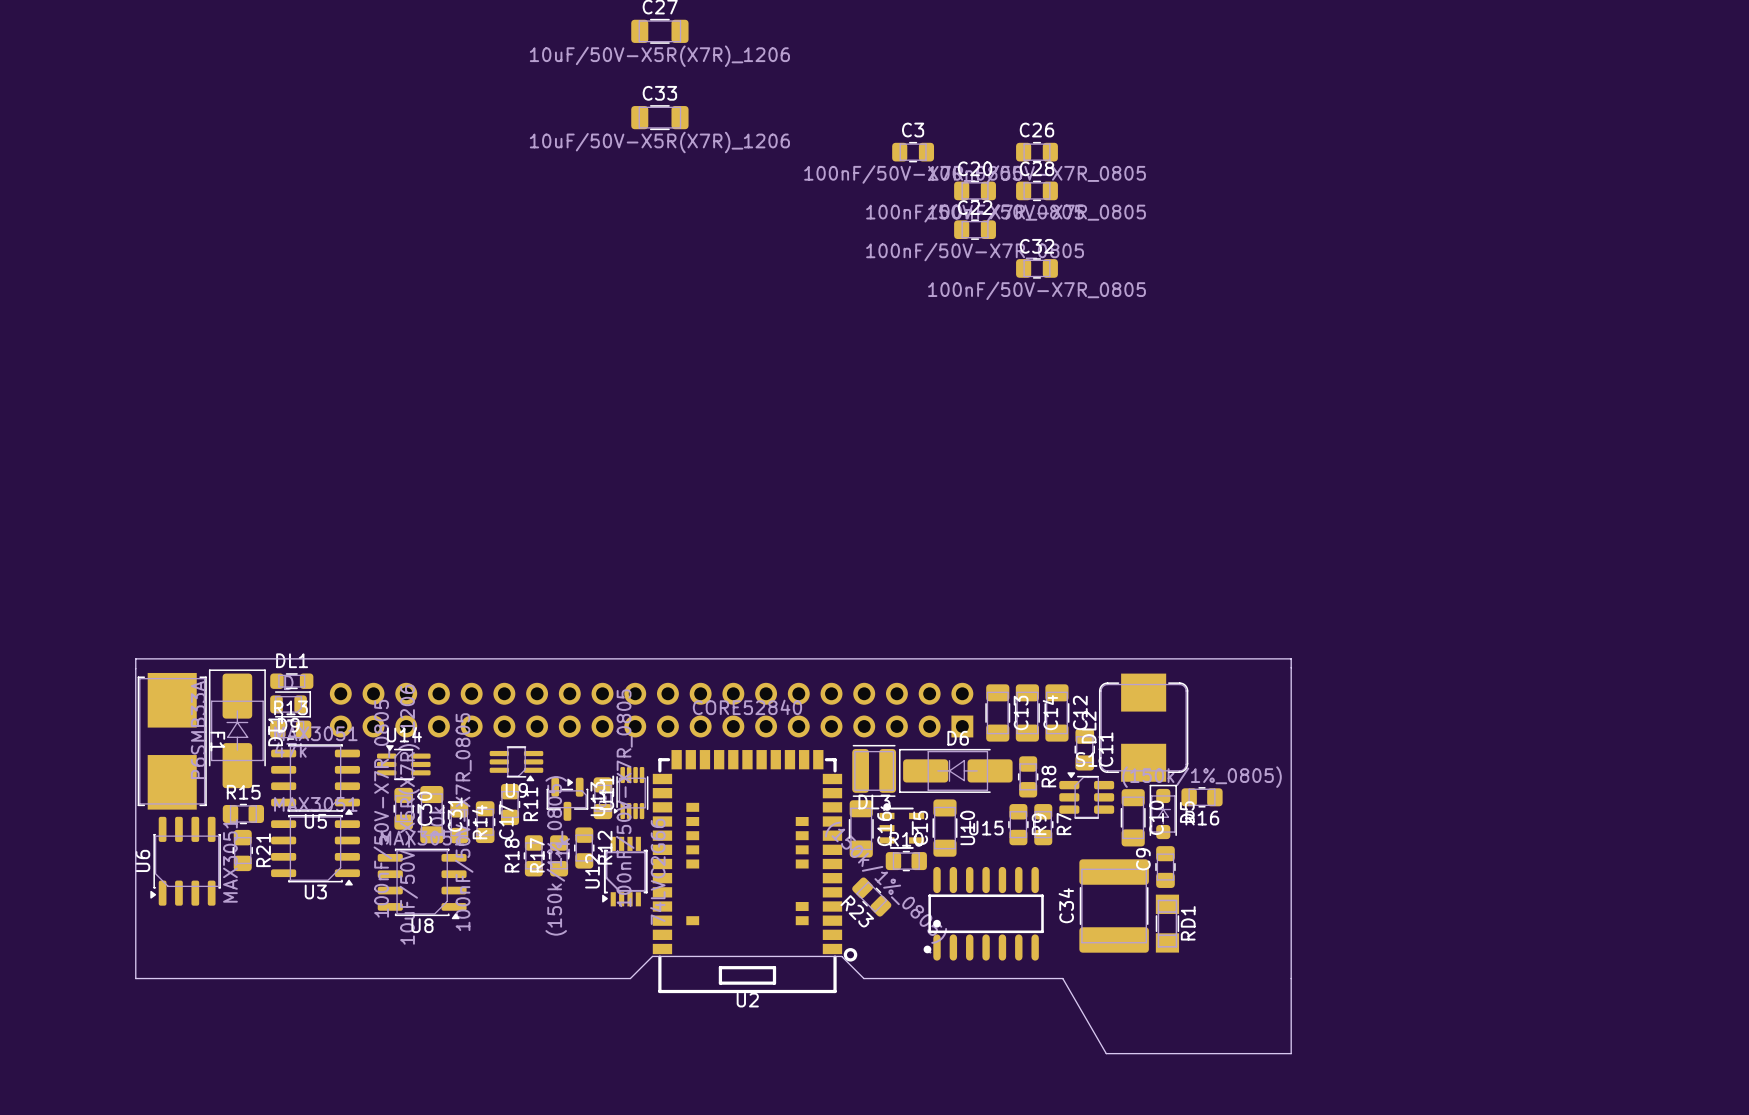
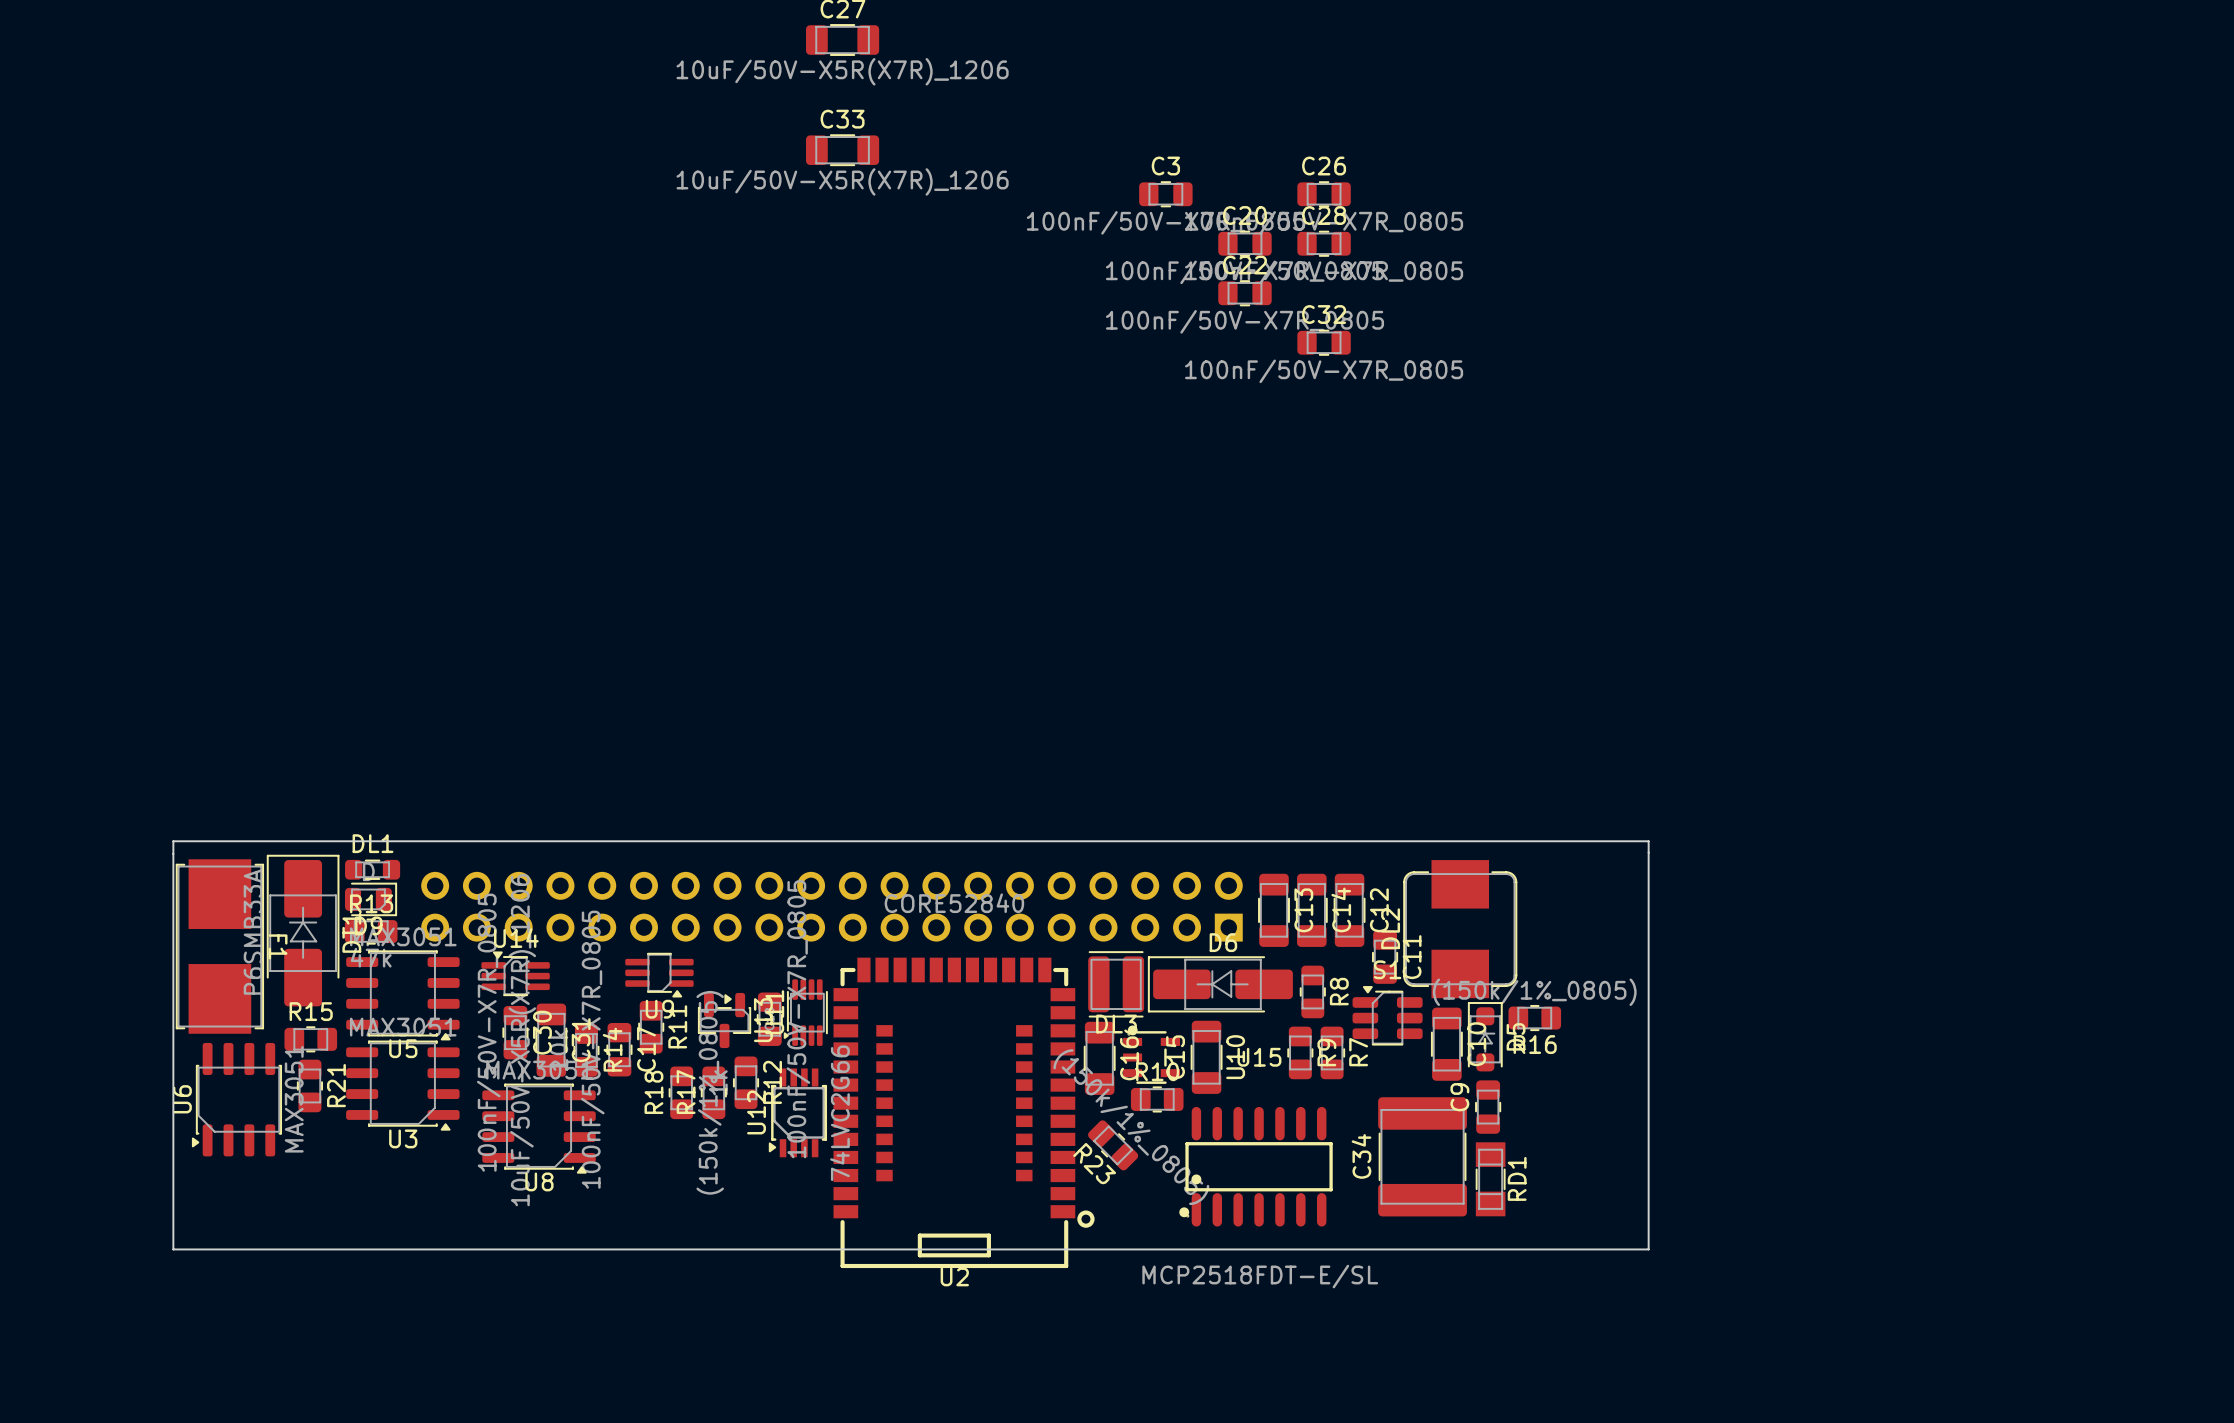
U2 footprint: [652, 750, 858, 994] -> [833, 957, 1095, 1269]
board edge: (841, 956) (652, 956) (630, 978) -> (1103, 1249) (804, 1249)
board edge: (841, 956) (863, 978) -> none
board edge: (1062, 978) (1106, 1053) (1291, 1053) (1291, 978) -> (1357, 1249) (1648, 1249)
U15 value: none -> MCP2518FDT-E/SL (1260, 1276)

